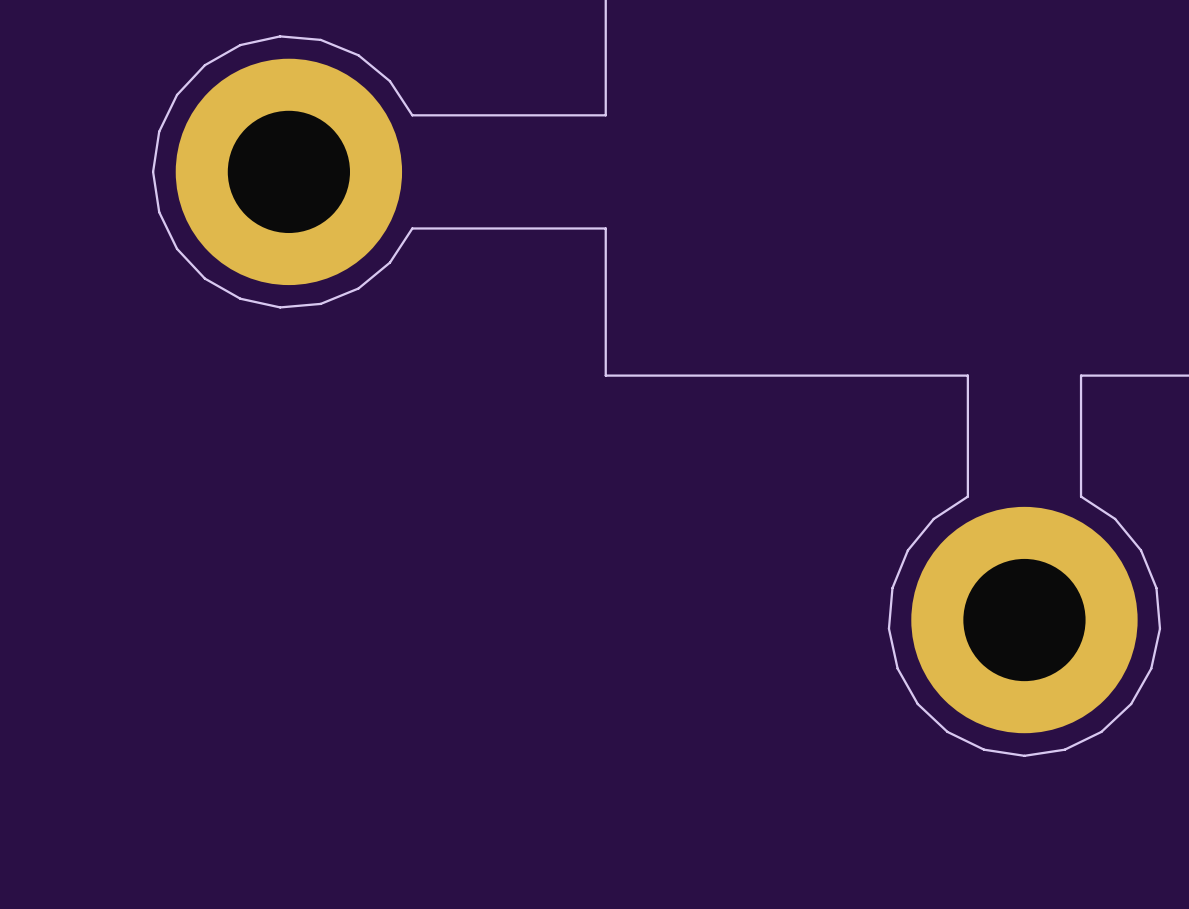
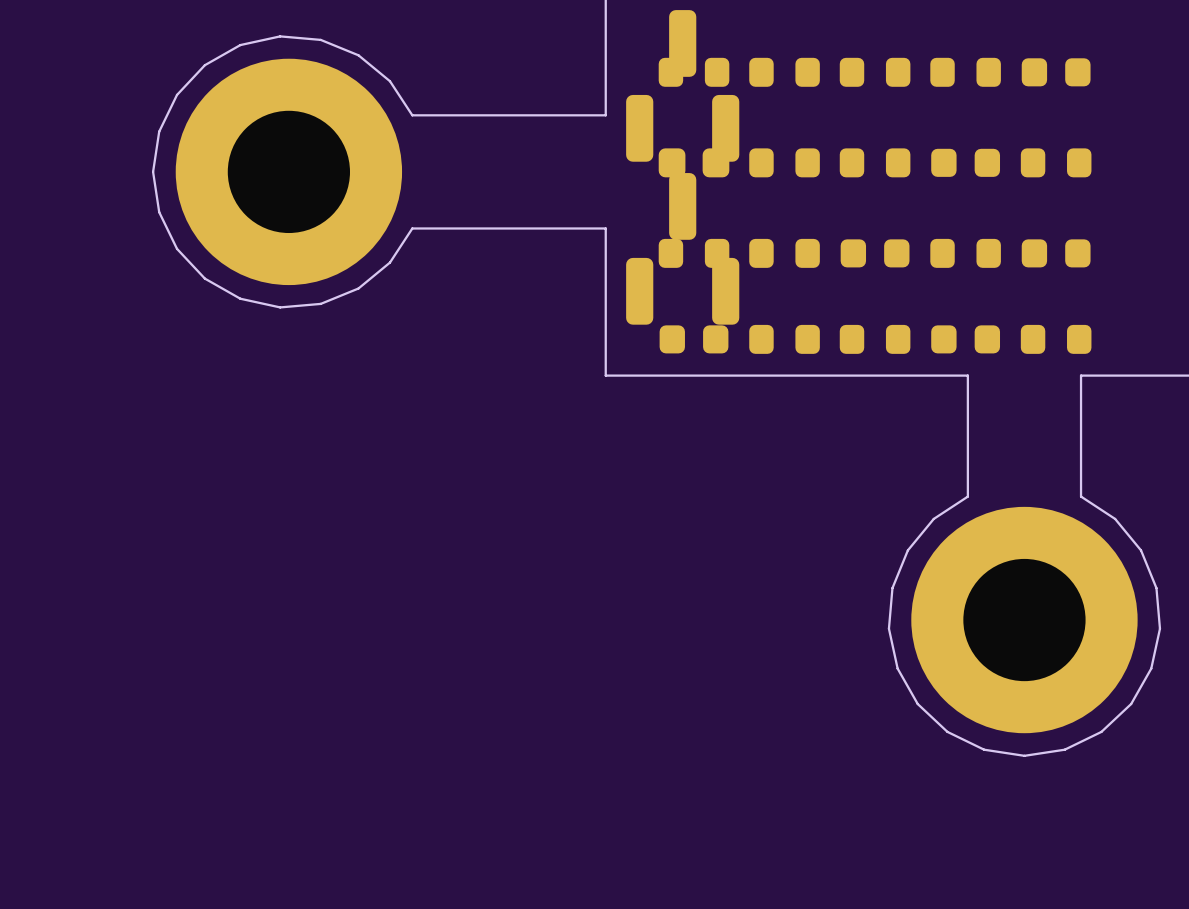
part: none -> (694, 72)
part: none -> (784, 72)
part: none -> (875, 72)
part: none -> (965, 72)
part: none -> (1056, 72)
part: none -> (682, 85)
part: none -> (694, 162)
part: none -> (784, 162)
part: none -> (875, 162)
part: none -> (965, 162)
part: none -> (1056, 162)
part: none -> (682, 248)
part: none -> (694, 253)
part: none -> (784, 253)
part: none -> (875, 253)
part: none -> (965, 253)
part: none -> (1056, 253)
part: none -> (694, 339)
part: none -> (784, 339)
part: none -> (875, 339)
part: none -> (965, 339)
part: none -> (1056, 339)

